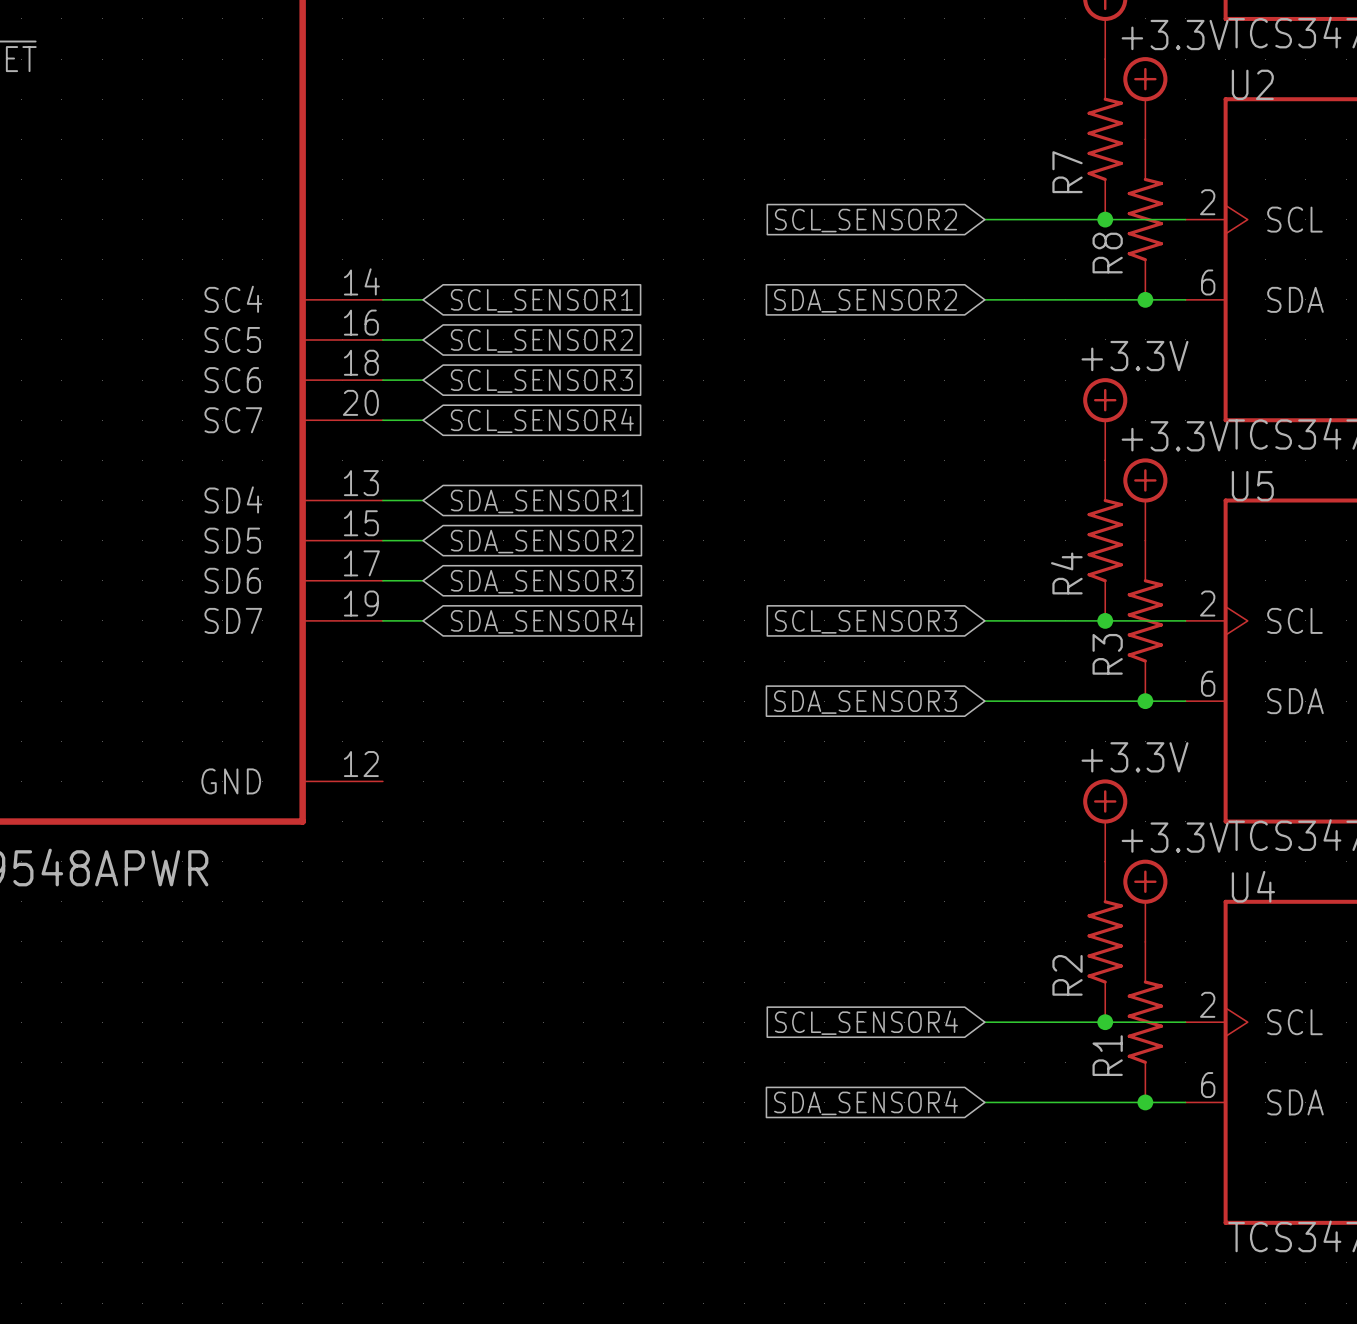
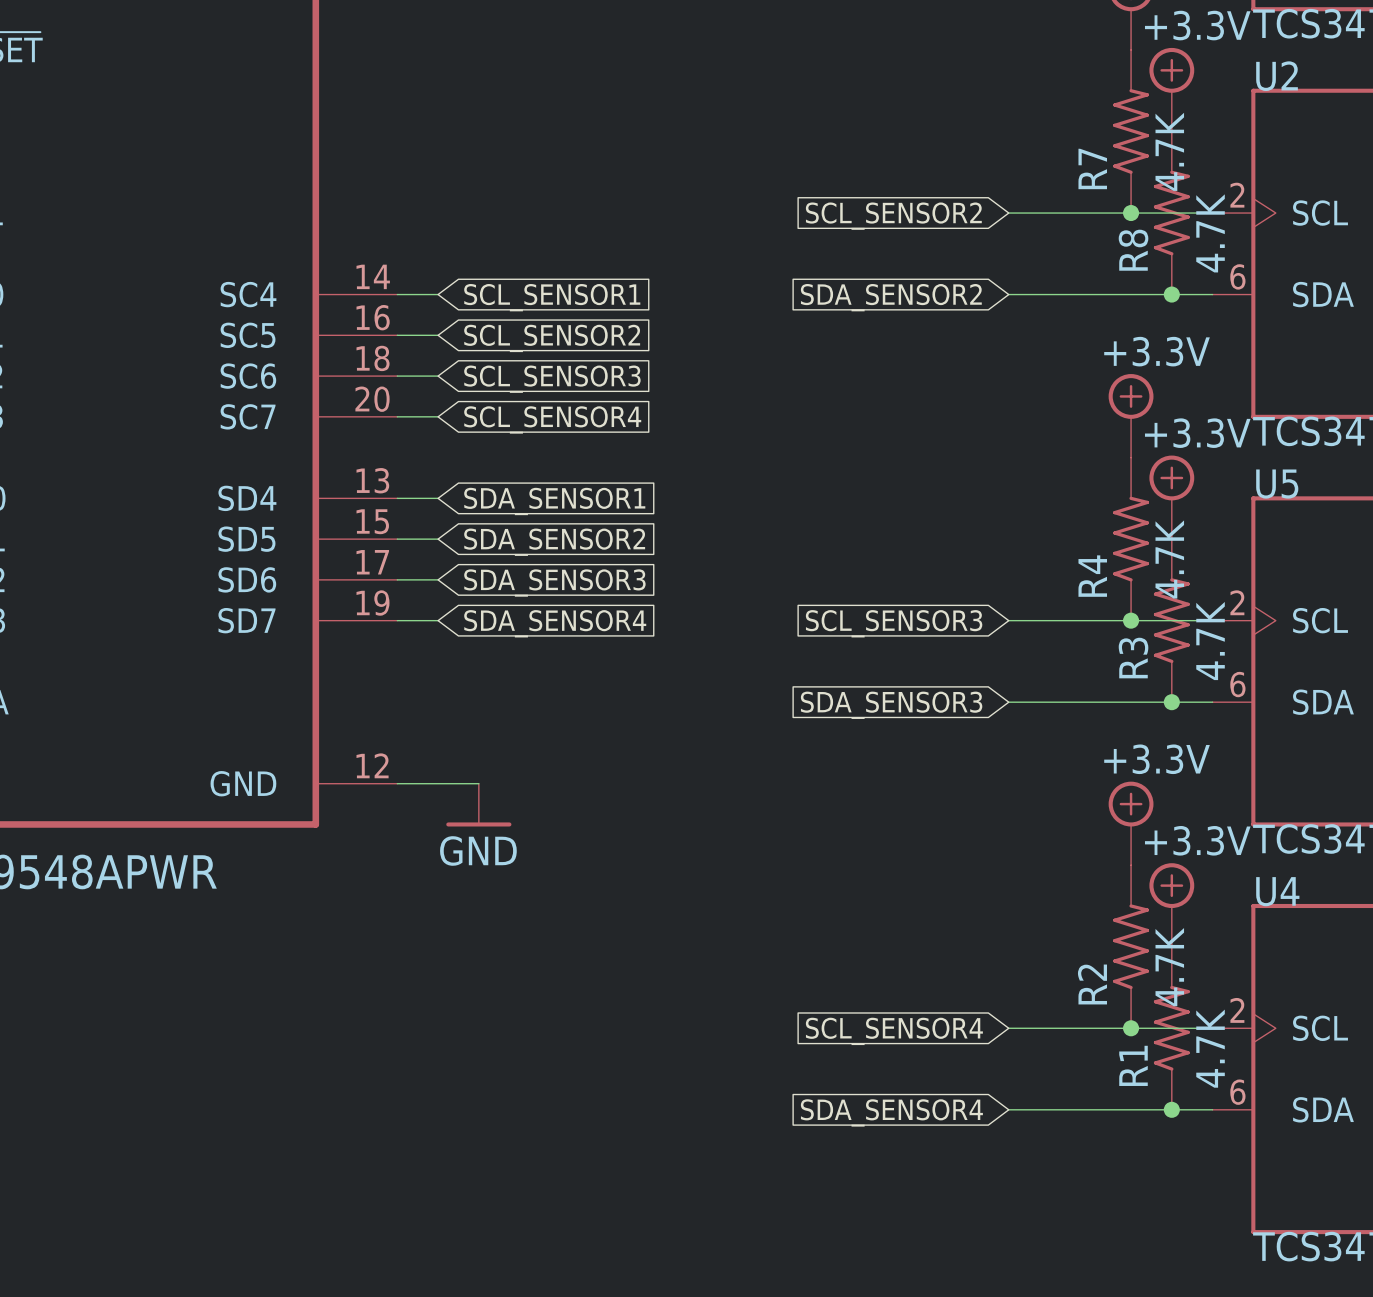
R7 value: none -> 4.7K (1169, 151)
R8 value: none -> 4.7K (1210, 233)
R4 value: none -> 4.7K (1169, 559)
R3 value: none -> 4.7K (1210, 641)
wire: none -> (397, 783) (478, 783)
power symbol: none -> GND (478, 805)
R2 value: none -> 4.7K (1169, 967)
R1 value: none -> 4.7K (1210, 1048)

